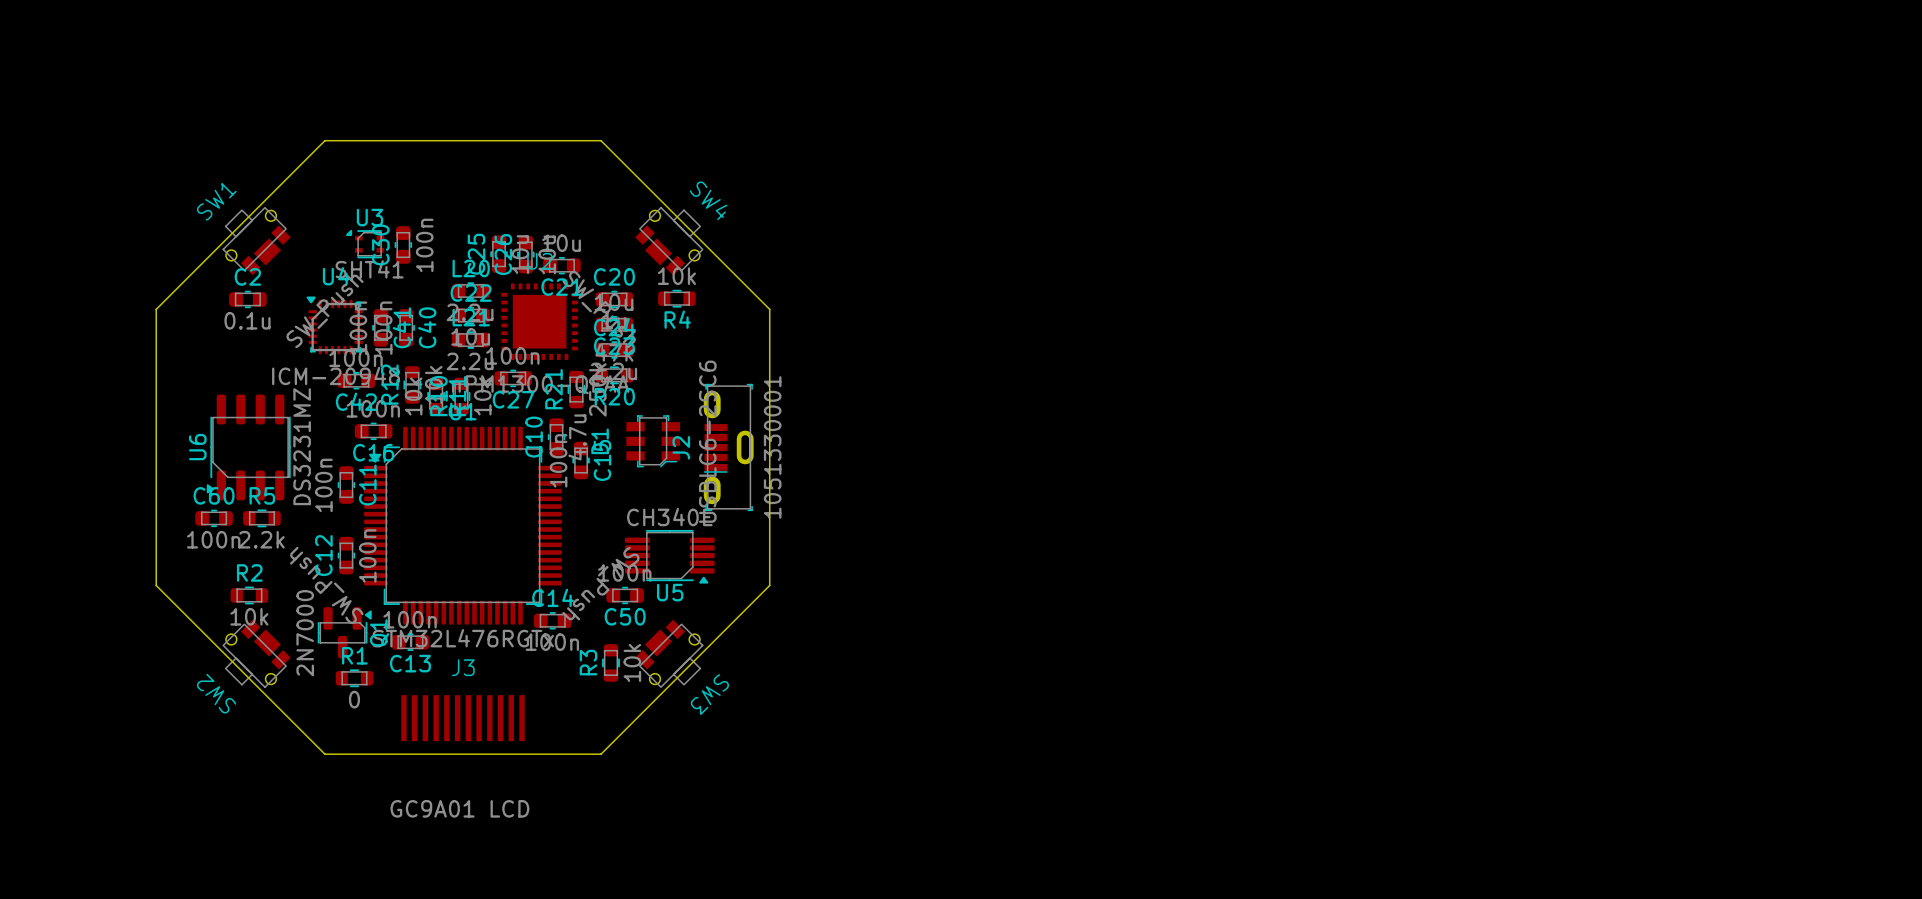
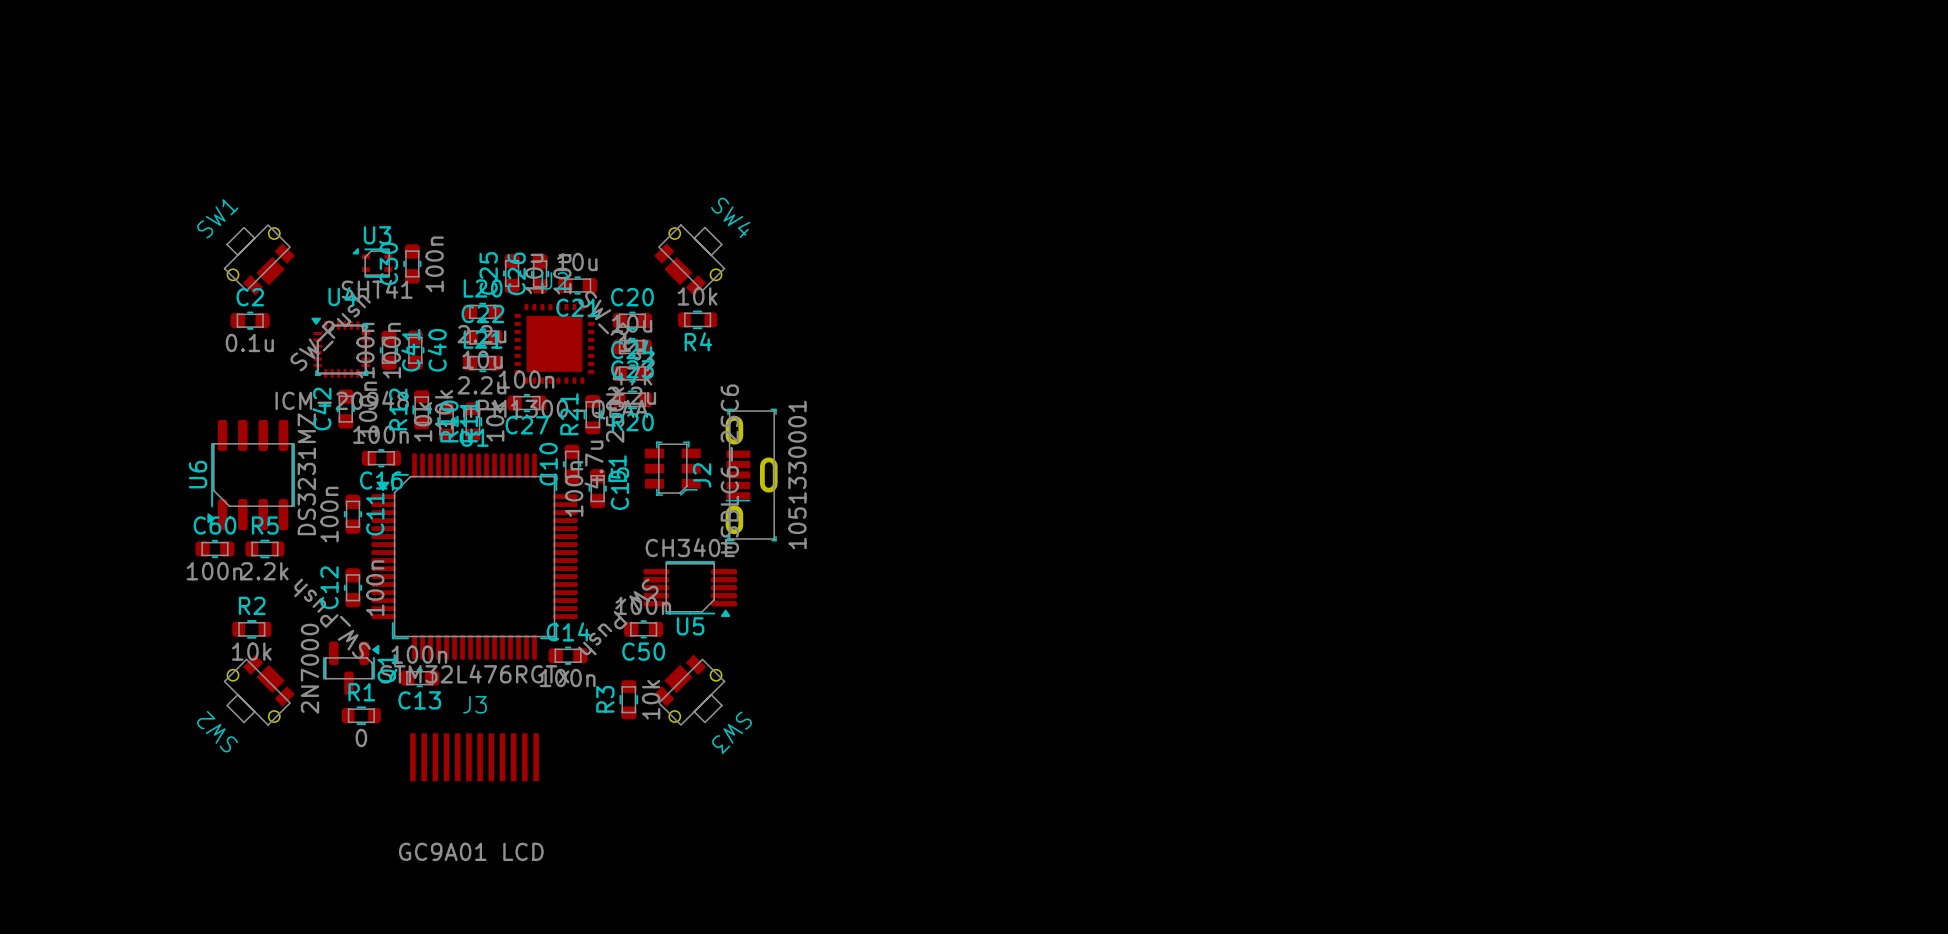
board edge: (324, 140) (156, 309) (156, 585) (324, 754) (601, 754) (769, 585) (769, 309) (601, 140) (324, 140) -> none
C42 rotation: 0° (356, 380) -> 90° clockwise (345, 409)

